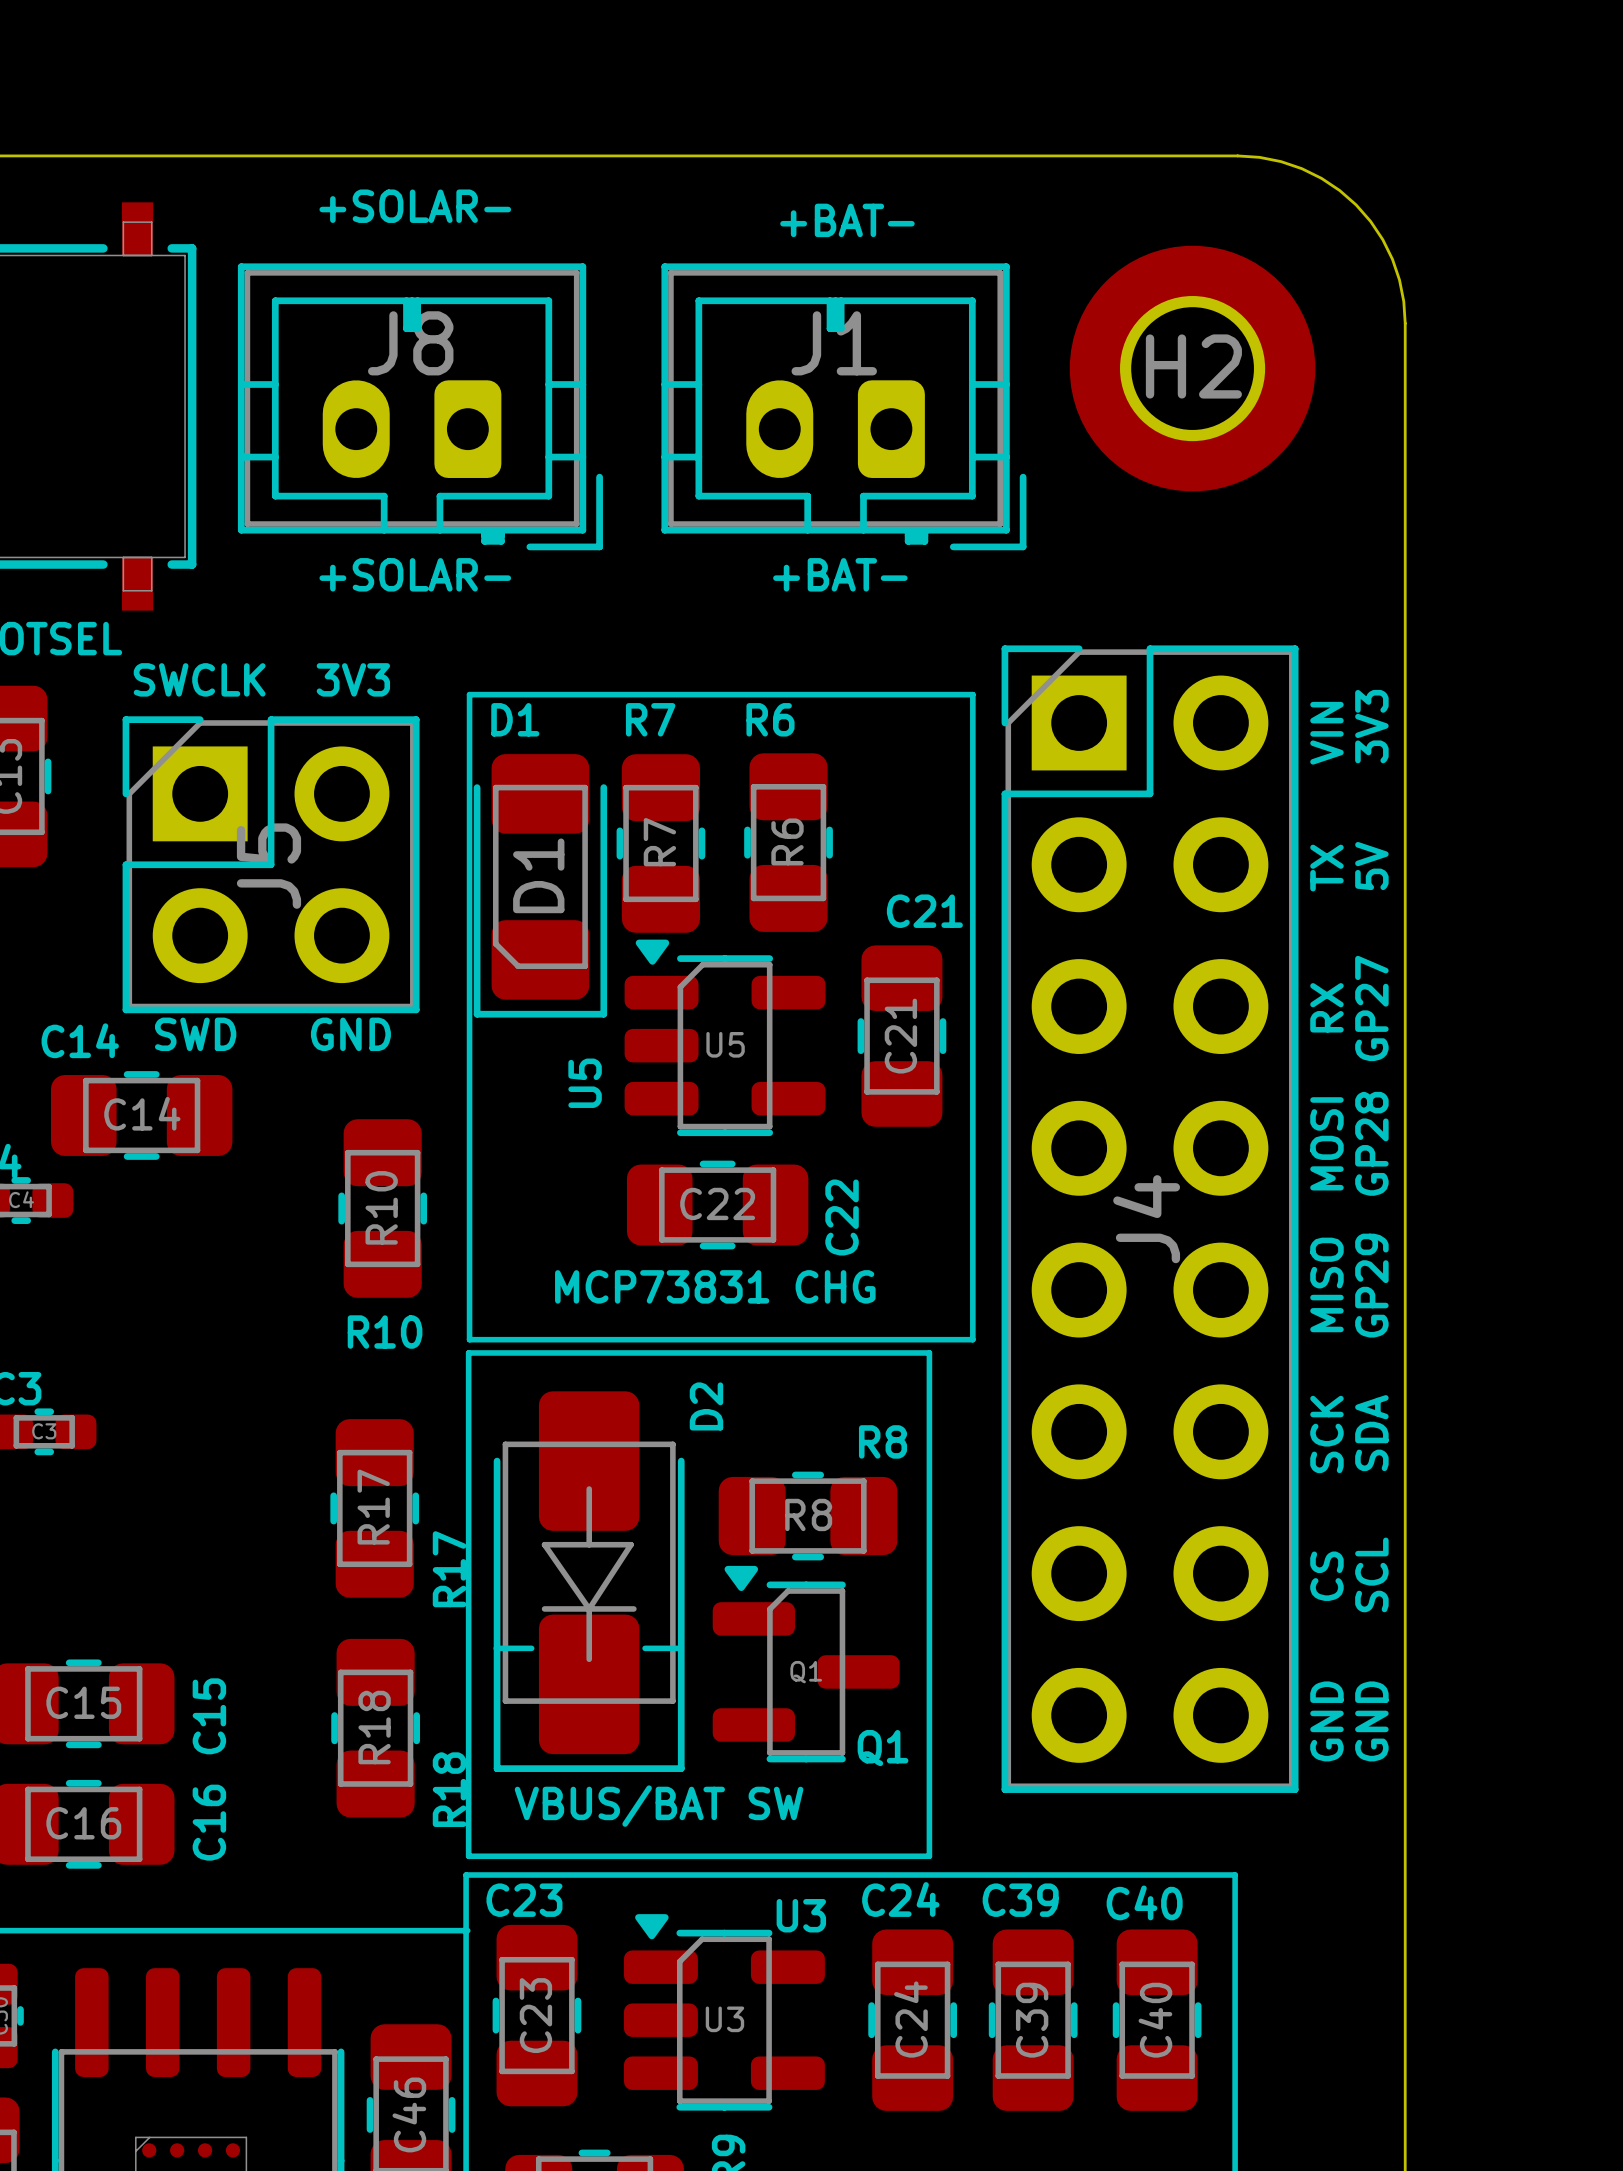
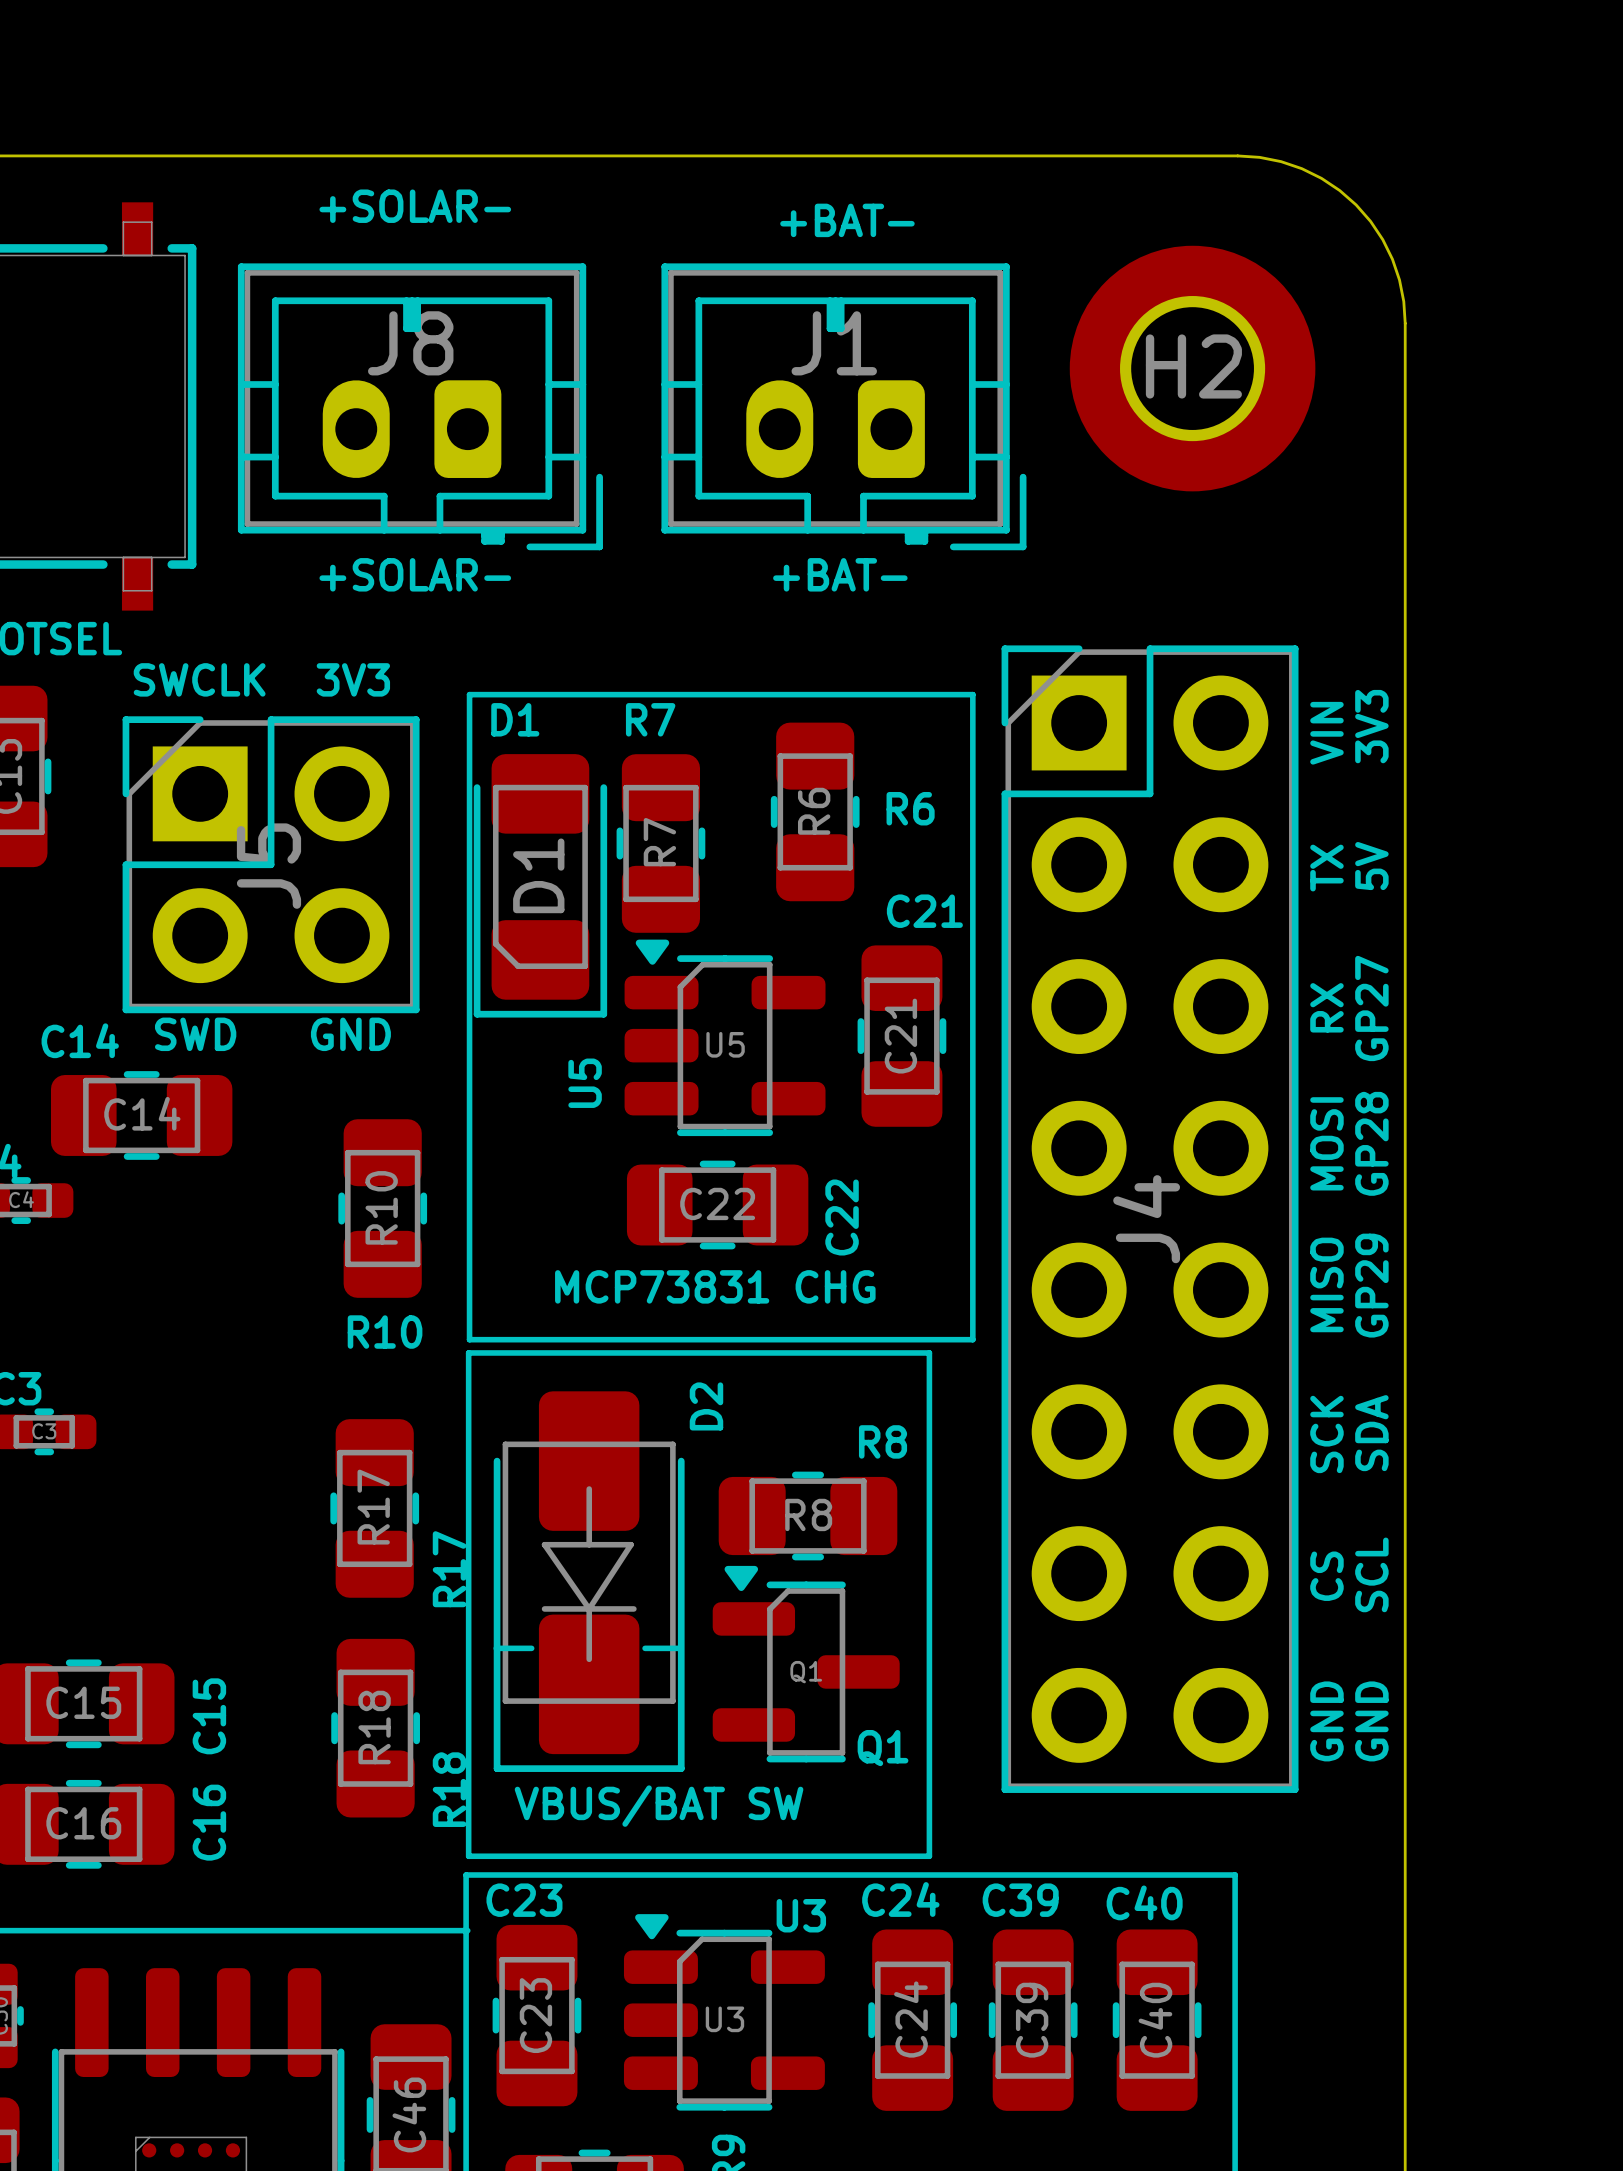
text position: R6 (770, 719) -> R6 (910, 808)
R6 position: (788, 842) -> (815, 811)

